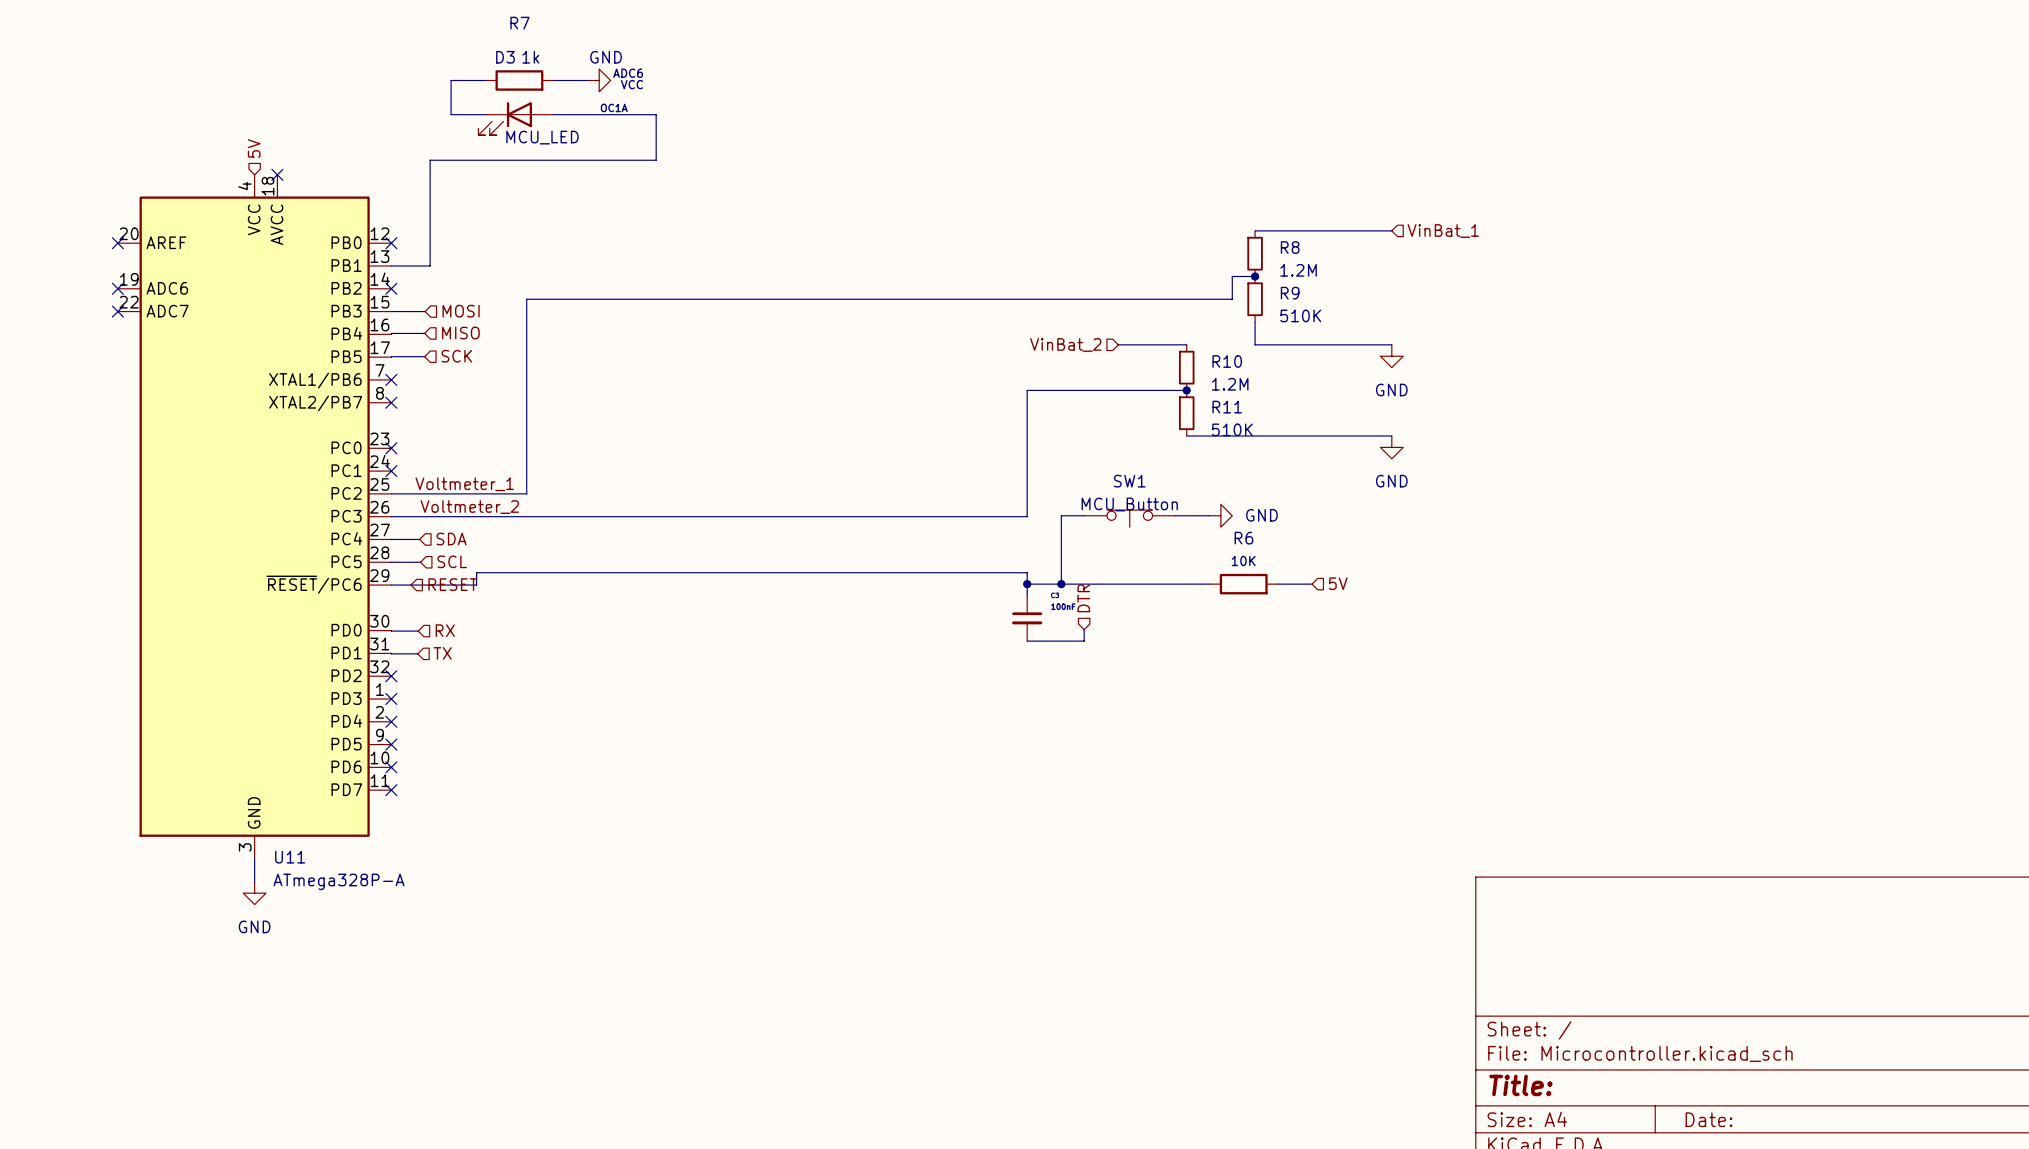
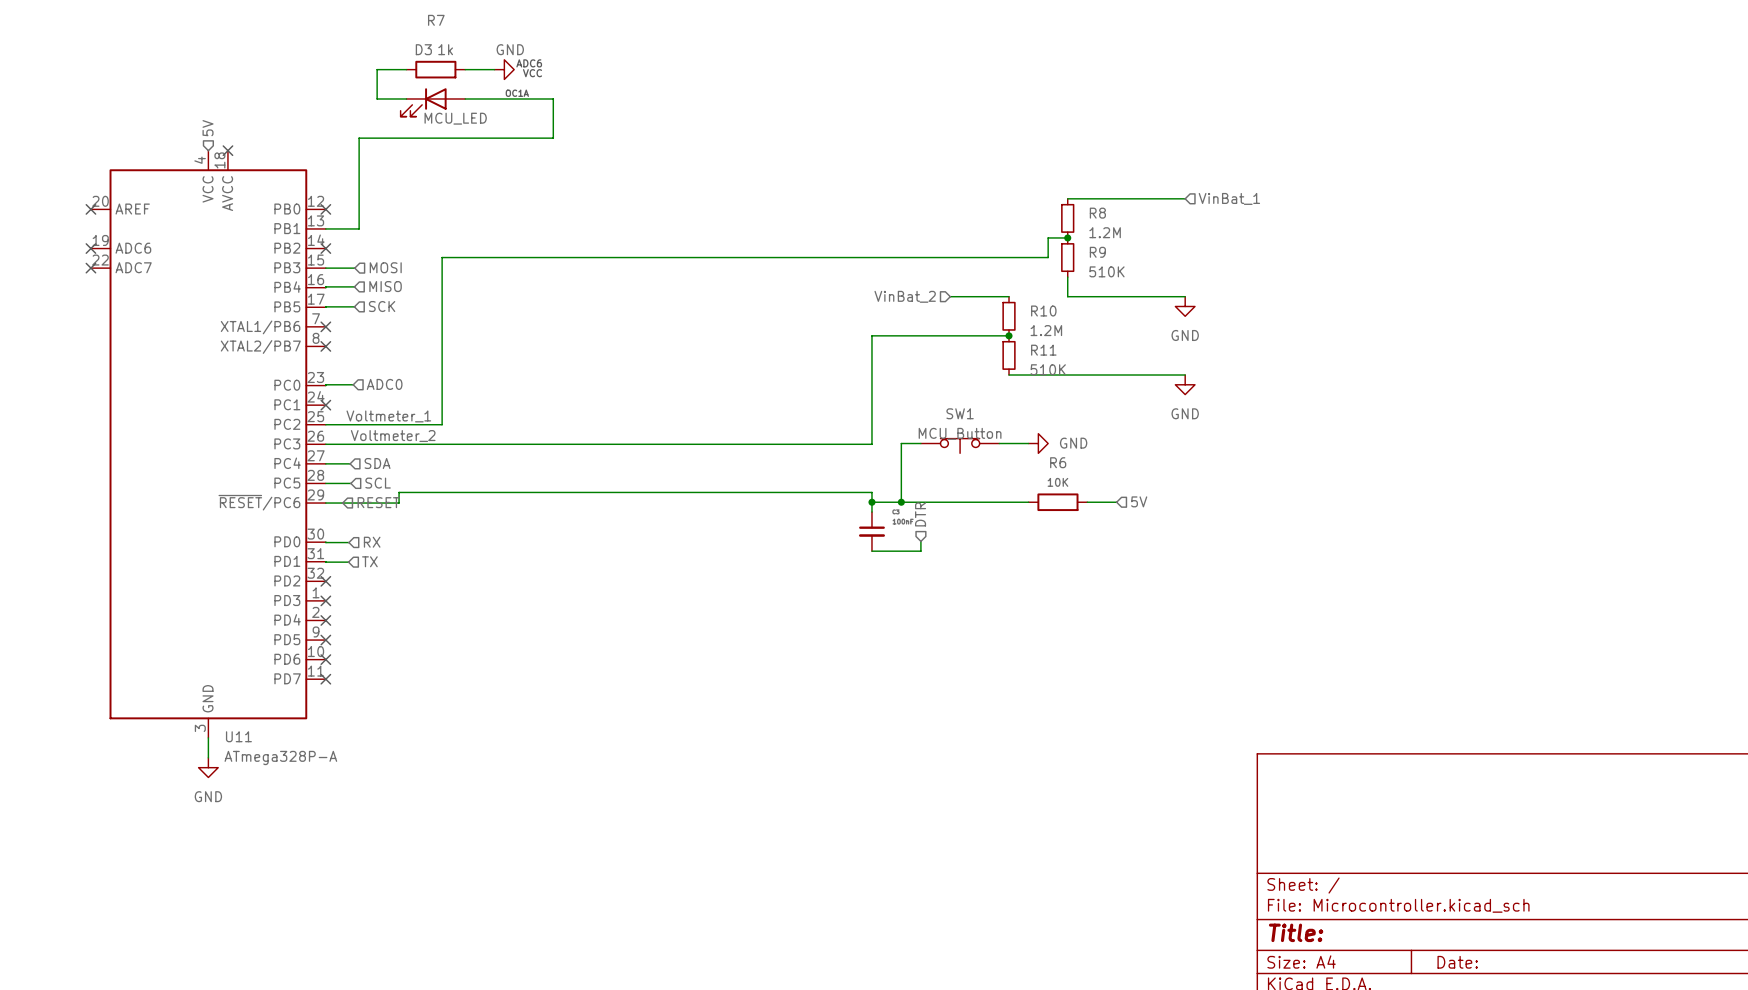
hierarchical label: none -> ADC0 (384, 384)
wire: none -> (353, 384) (325, 385)
no-connect mark: (391, 448) -> none

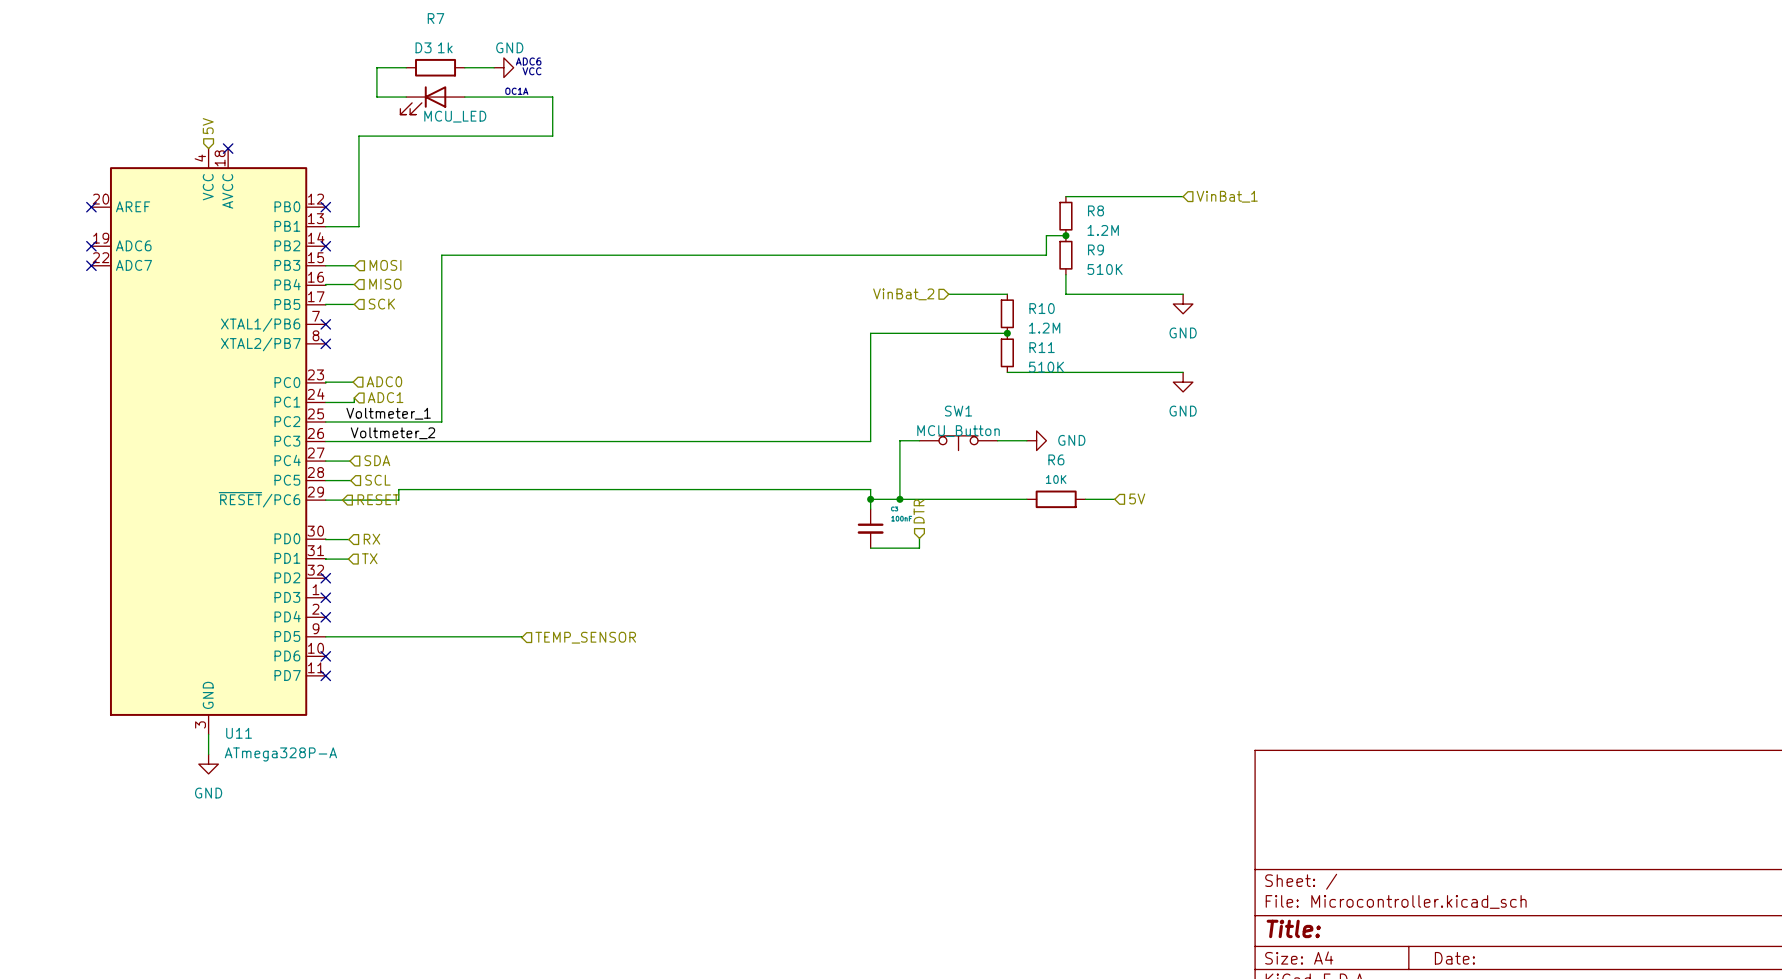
wire: none -> (354, 397) (354, 402) (325, 402)
hierarchical label: none -> ADC1 (385, 397)
no-connect mark: (325, 405) -> none
wire: none -> (325, 636) (521, 637)
no-connect mark: (325, 640) -> none
hierarchical label: none -> TEMP_SENSOR (585, 637)

